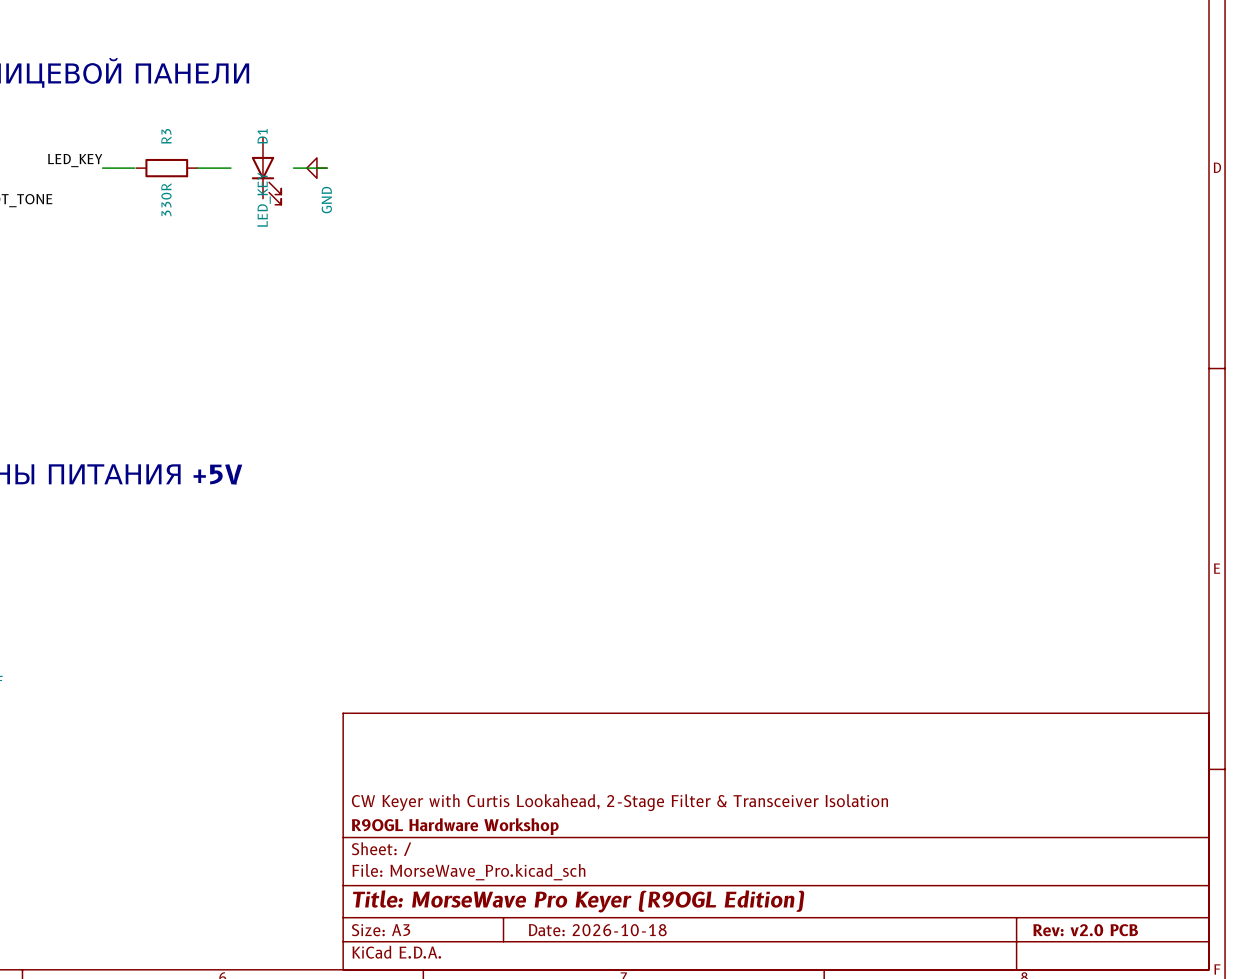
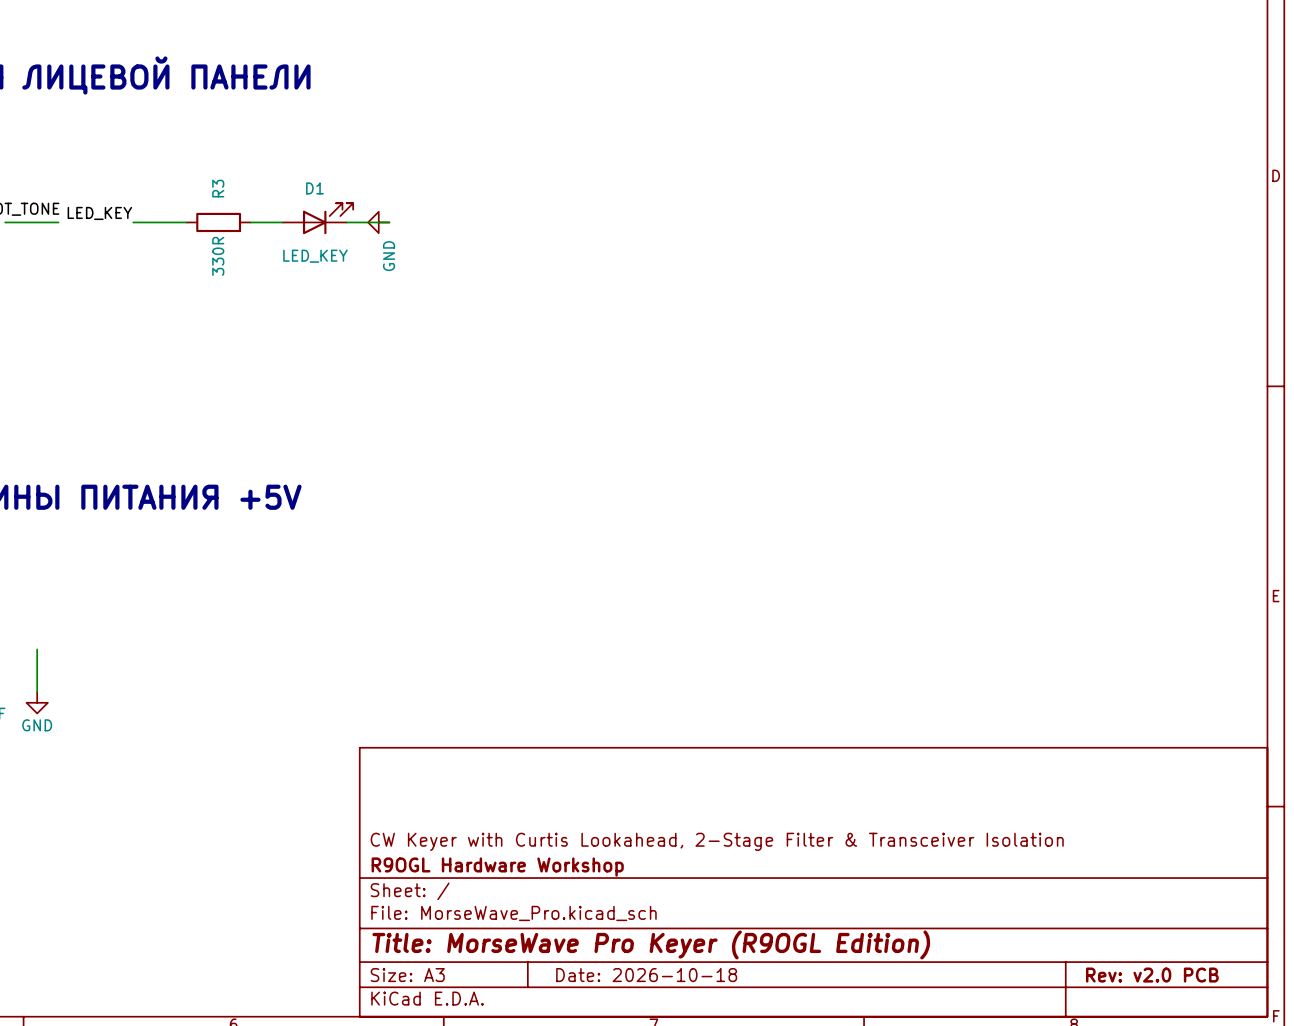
label position: LED_KEY (75, 160) -> LED_KEY (99, 213)
wire: (102, 168) (134, 168) -> none
R3 position: (166, 168) -> (218, 222)
wire: (197, 168) (230, 168) -> none
wire: (293, 168) (327, 168) -> none
power symbol position: GND (316, 168) -> GND (378, 222)
D1 position: (266, 171) -> (317, 218)
D1 rotation: 0° (266, 180) -> 90° counterclockwise (328, 218)
wire: none -> (5, 222) (58, 222)
wire: none -> (133, 222) (186, 222)
wire: none -> (250, 222) (282, 222)
wire: none -> (346, 222) (389, 222)
wire: none -> (37, 649) (37, 692)
power symbol: none -> GND (37, 702)

